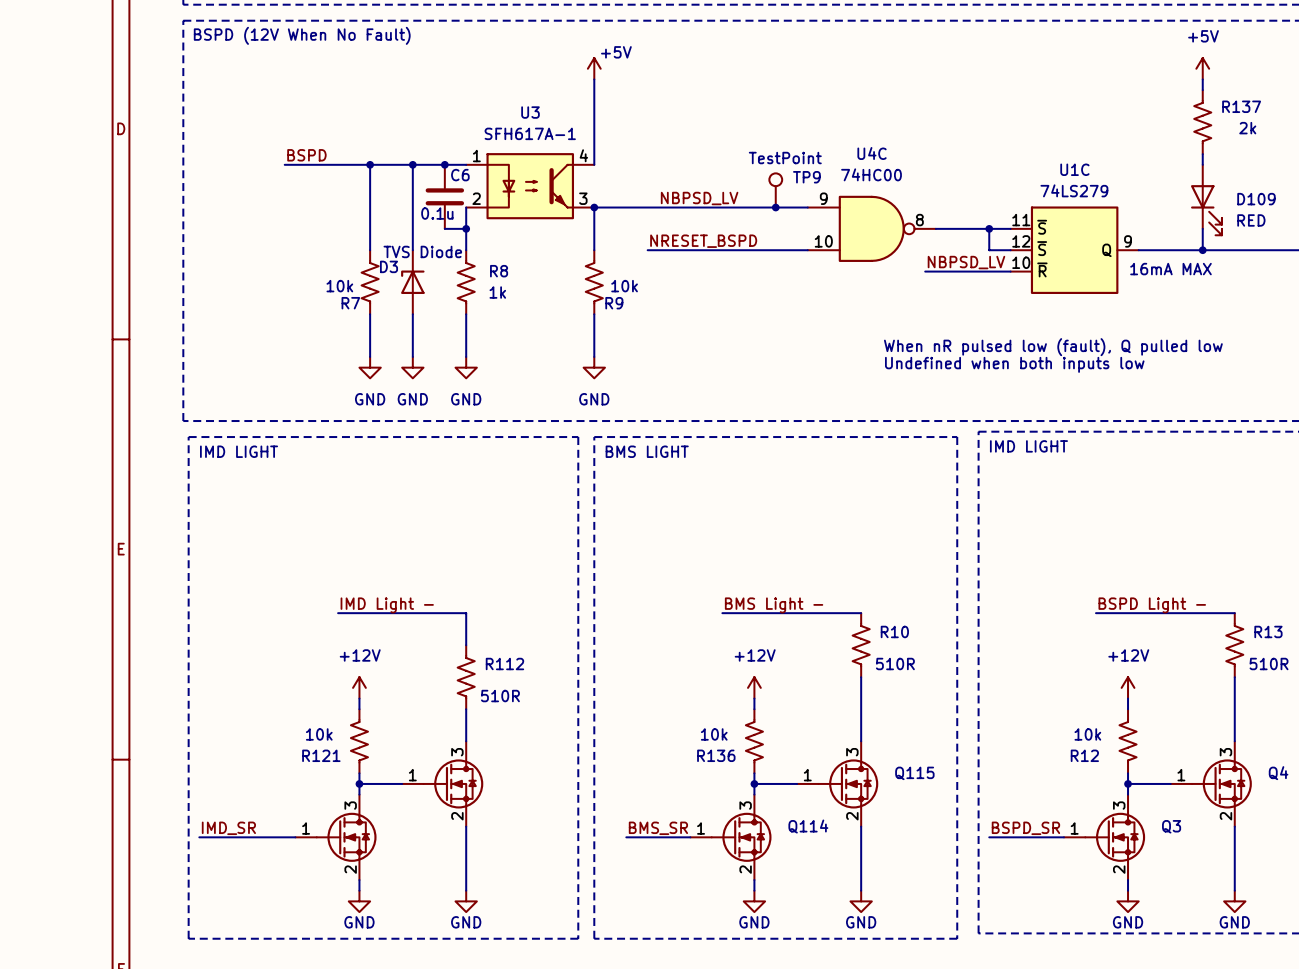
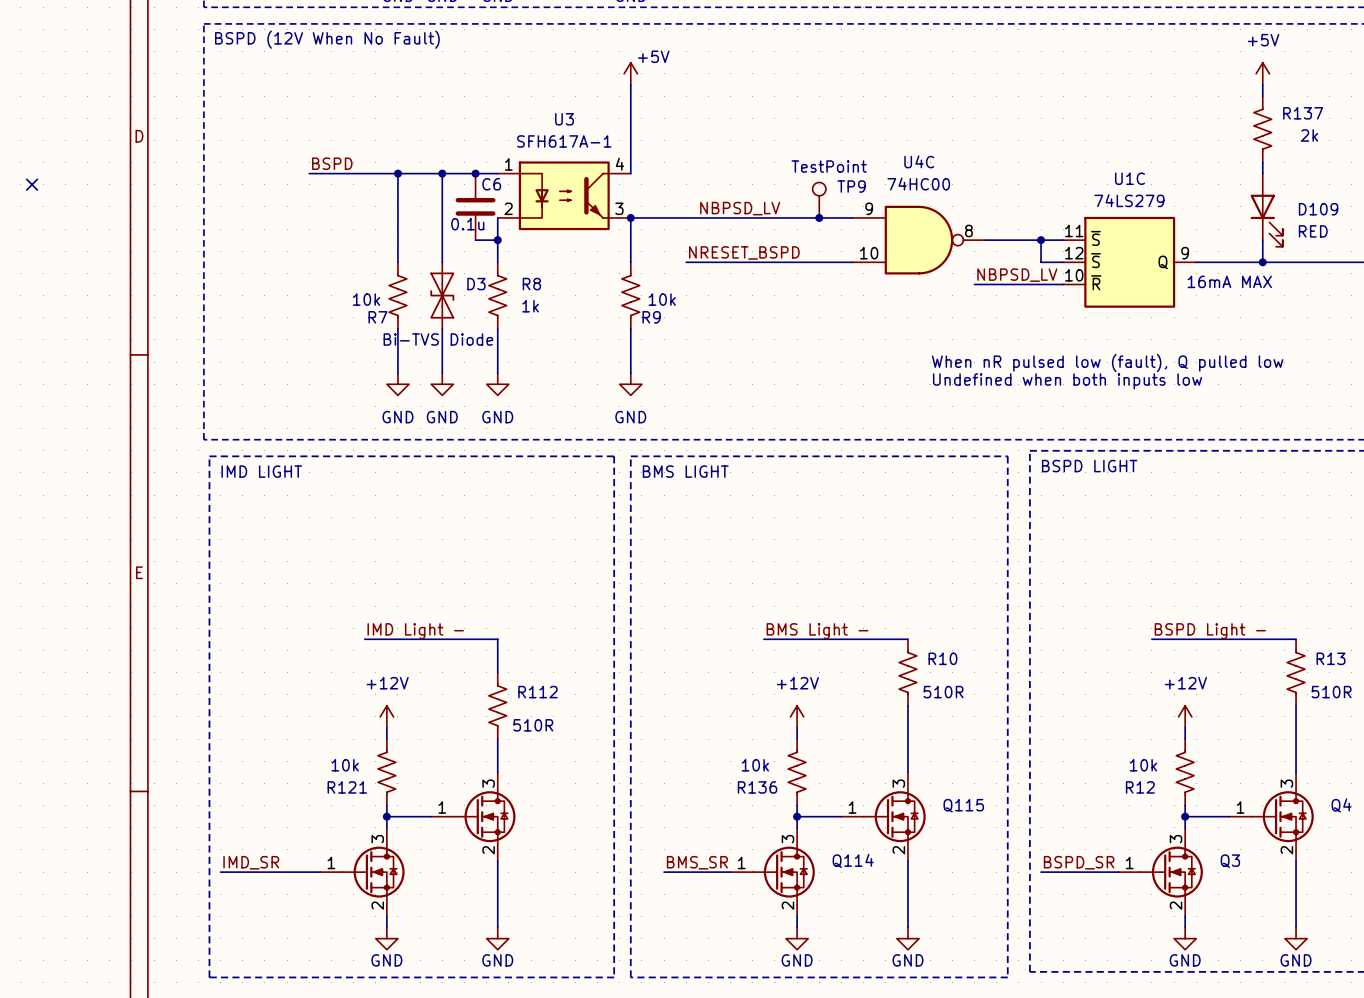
no-connect mark: none -> (32, 184)
D3 symbol: [401, 250, 425, 315] -> [430, 262, 455, 329]
D3 value: TVS Diode (422, 251) -> Bi-TVS Diode (438, 339)
D3 name position: D3 (389, 266) -> D3 (476, 284)
text: IMD LIGHT (1028, 446) -> BSPD LIGHT (1089, 466)

